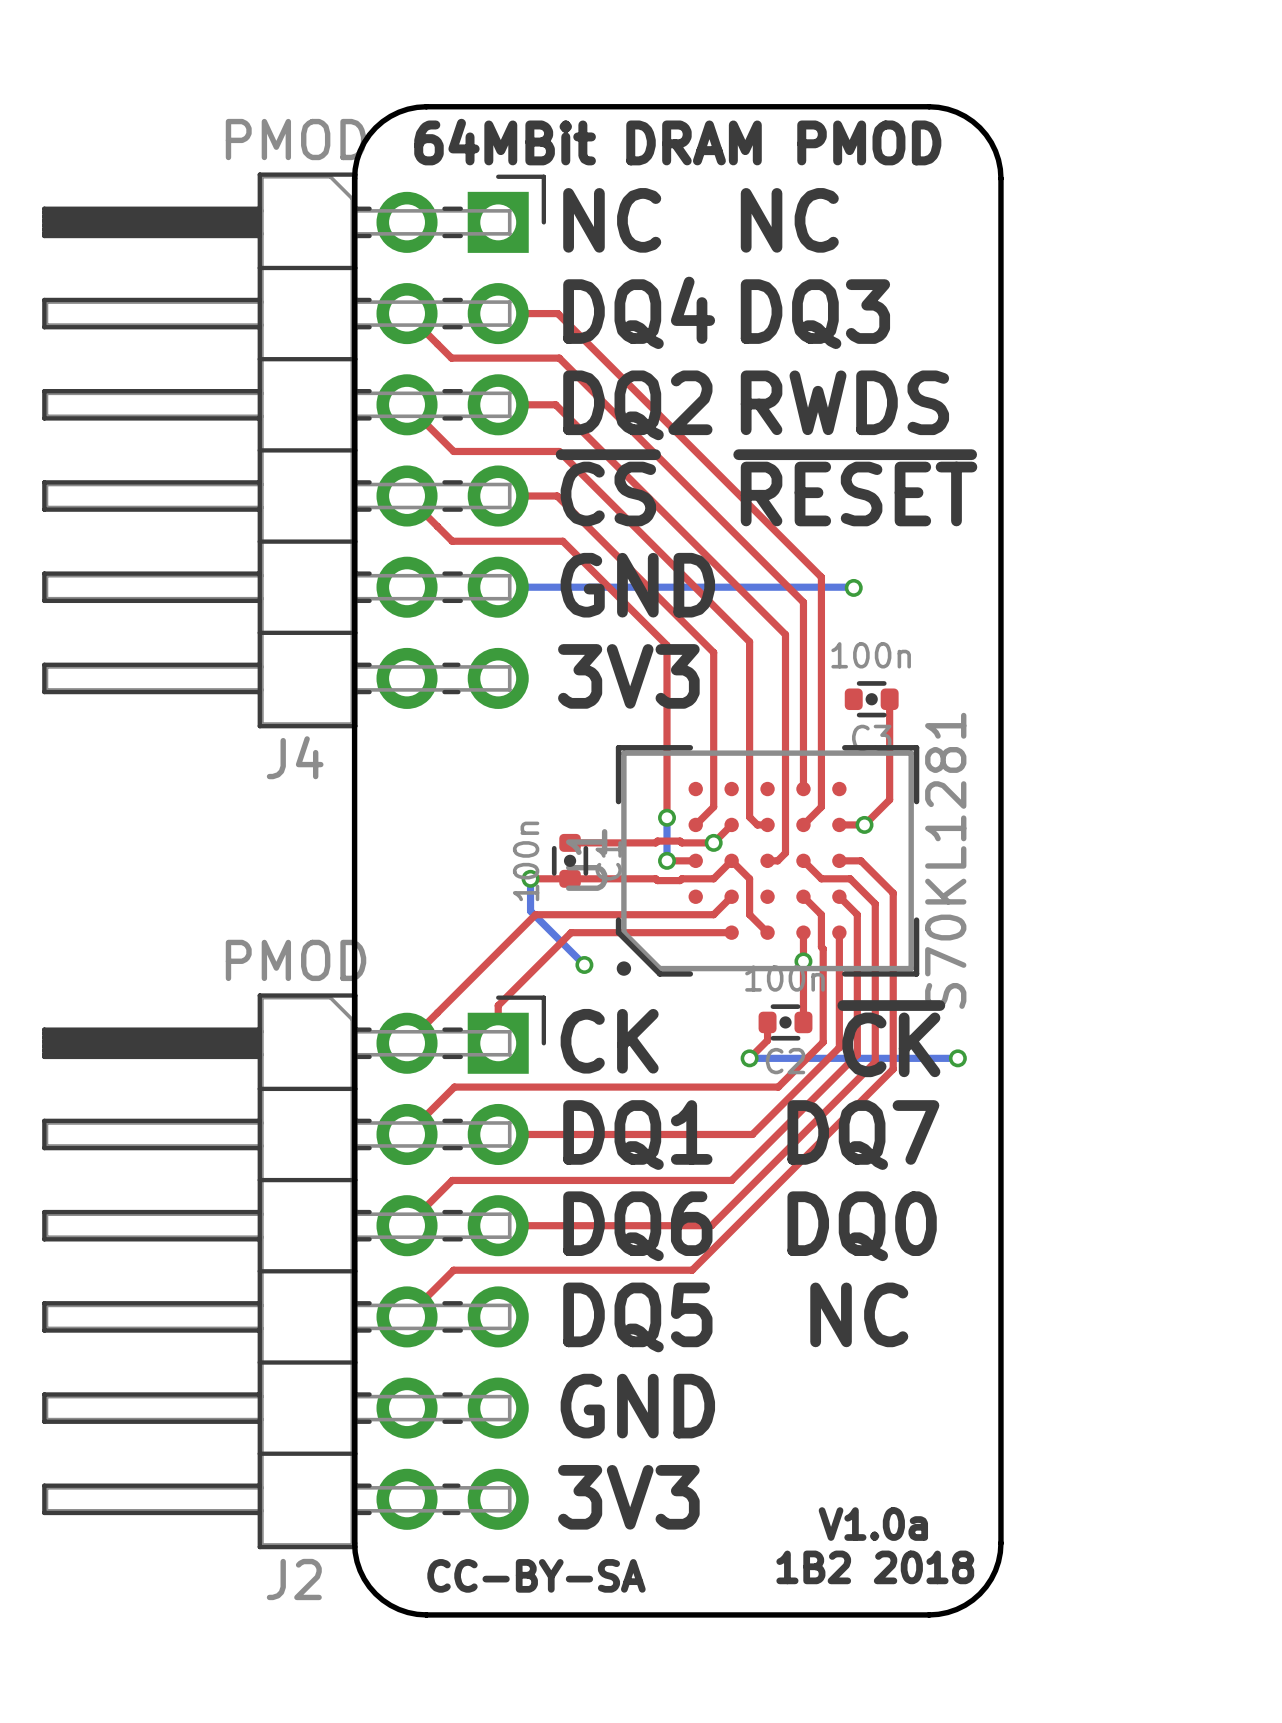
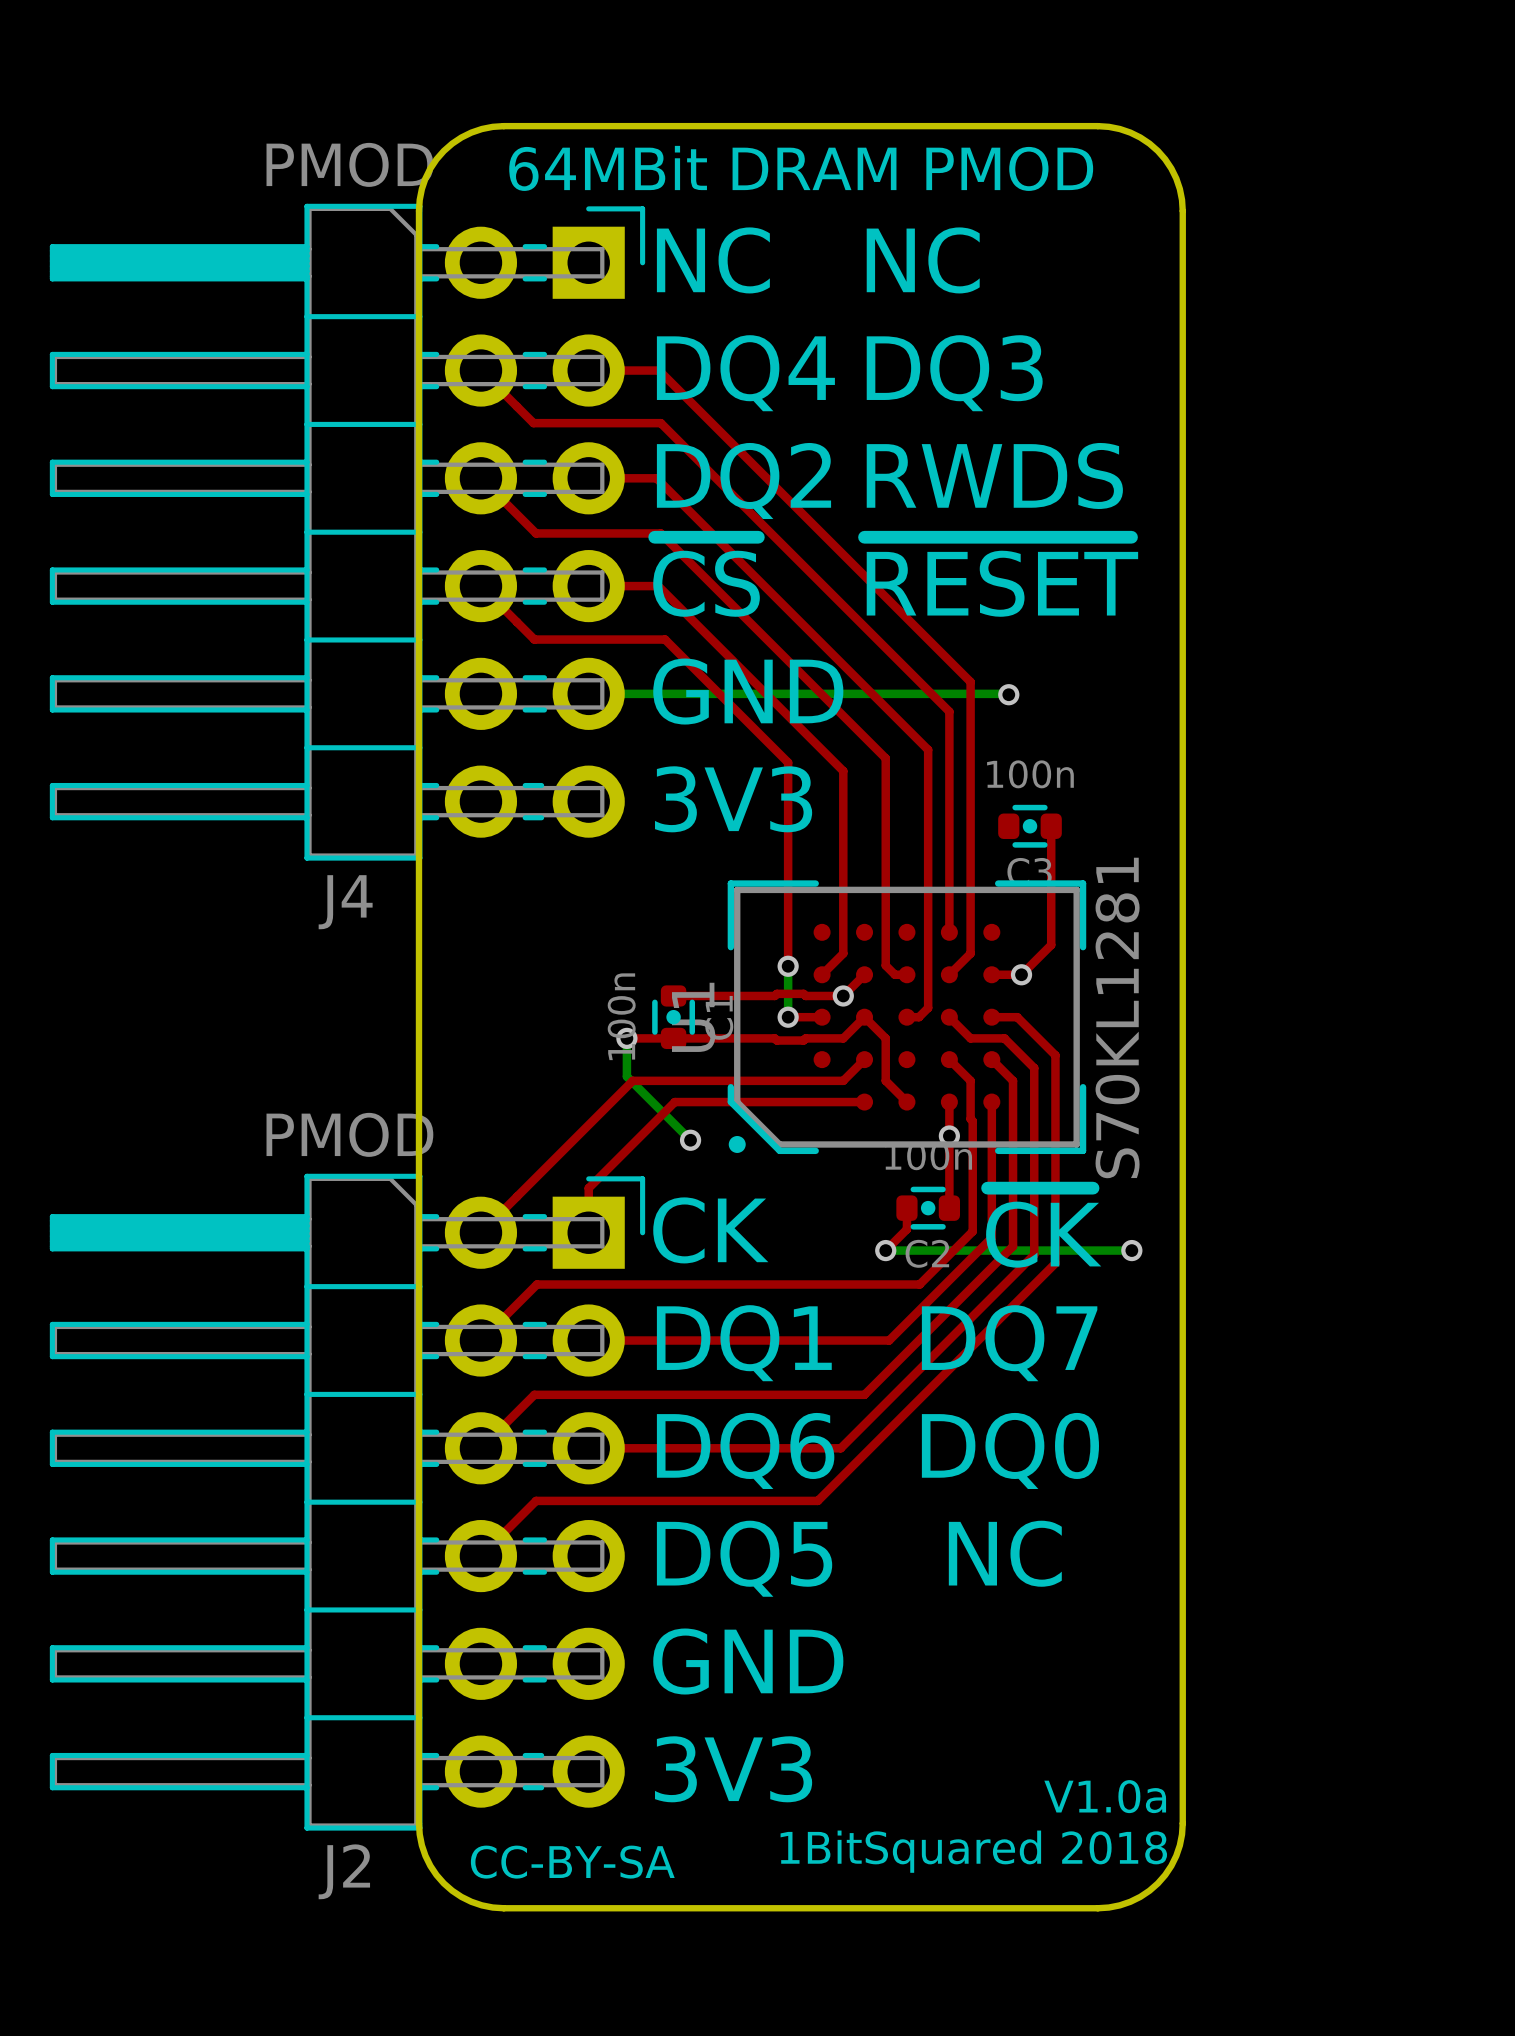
text position: V1.0a (873, 1524) -> V1.0a (1105, 1796)
text: 1B2 2018 (875, 1567) -> none
text: none -> 1BitSquared 2018 (973, 1851)
text position: CC-BY-SA (536, 1575) -> CC-BY-SA (572, 1862)

